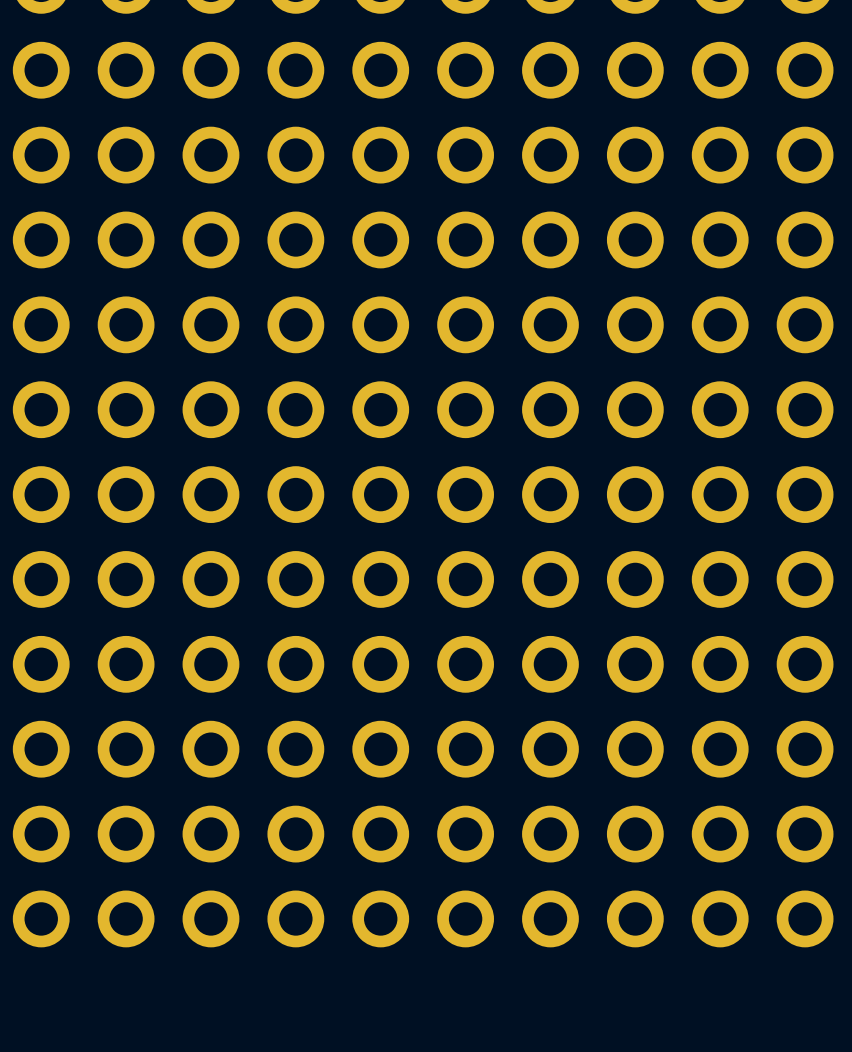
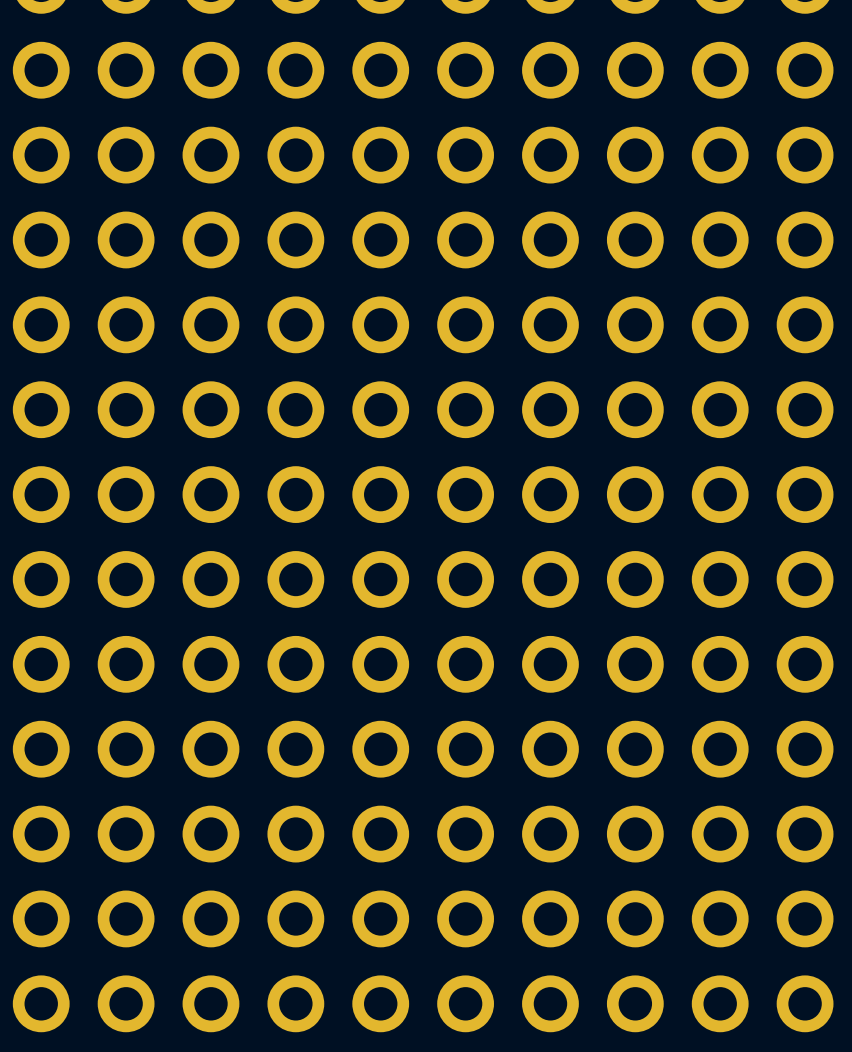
part: none -> (41, 1003)
part: none -> (126, 1003)
part: none -> (210, 1003)
part: none -> (295, 1003)
part: none -> (380, 1003)
part: none -> (465, 1003)
part: none -> (550, 1003)
part: none -> (635, 1003)
part: none -> (720, 1003)
part: none -> (805, 1003)

